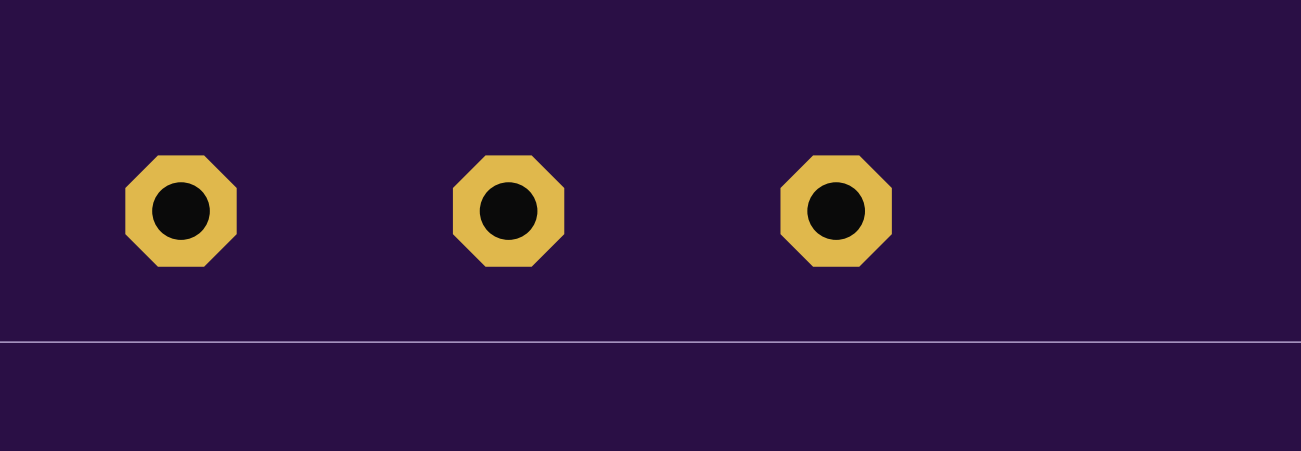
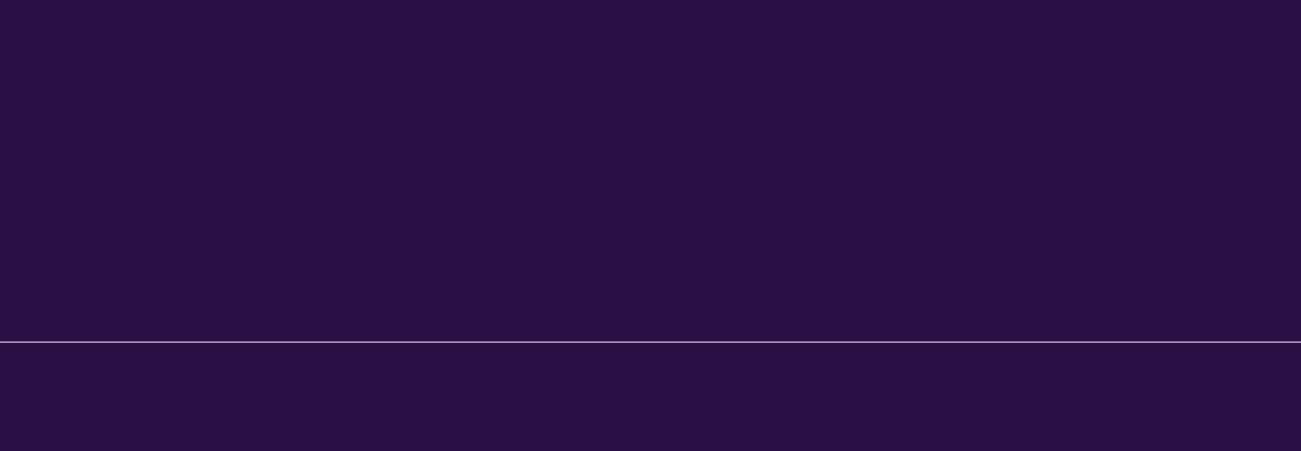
part: (181, 211) -> none
part: (508, 211) -> none
part: (836, 211) -> none

